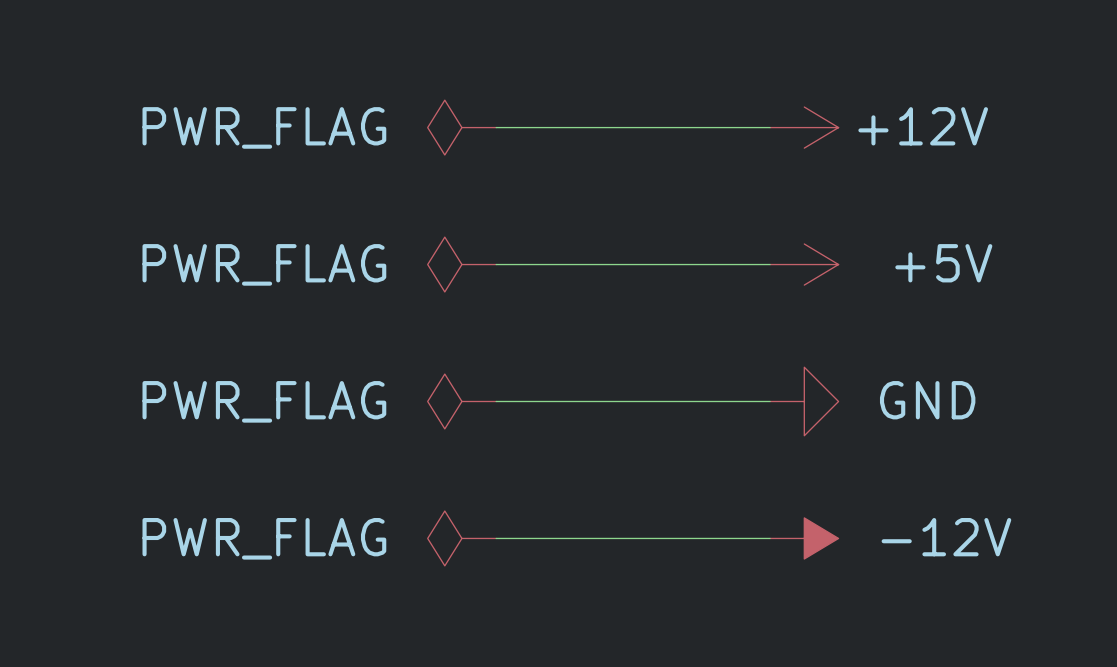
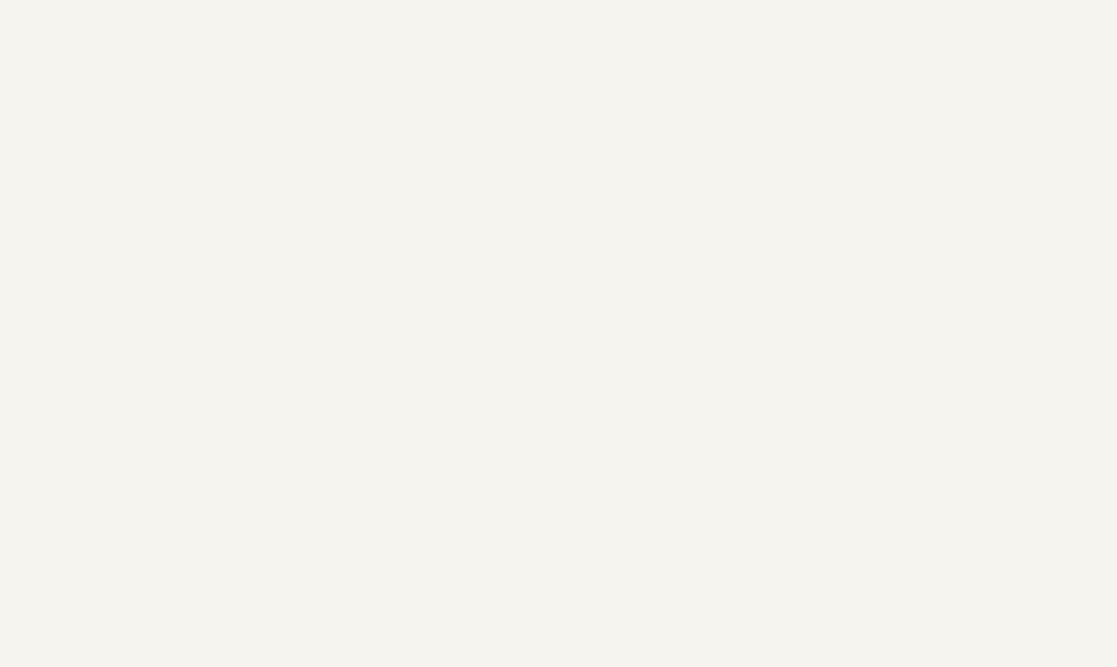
power symbol: PWR_FLAG (461, 127) -> none
wire: (496, 127) (770, 127) -> none
power symbol: +12V (804, 127) -> none
power symbol: PWR_FLAG (461, 264) -> none
wire: (496, 264) (770, 264) -> none
power symbol: +5V (804, 264) -> none
power symbol: PWR_FLAG (461, 401) -> none
wire: (496, 401) (770, 401) -> none
power symbol: GND (804, 401) -> none
power symbol: PWR_FLAG (461, 538) -> none
wire: (496, 538) (770, 538) -> none
power symbol: -12V (804, 538) -> none

